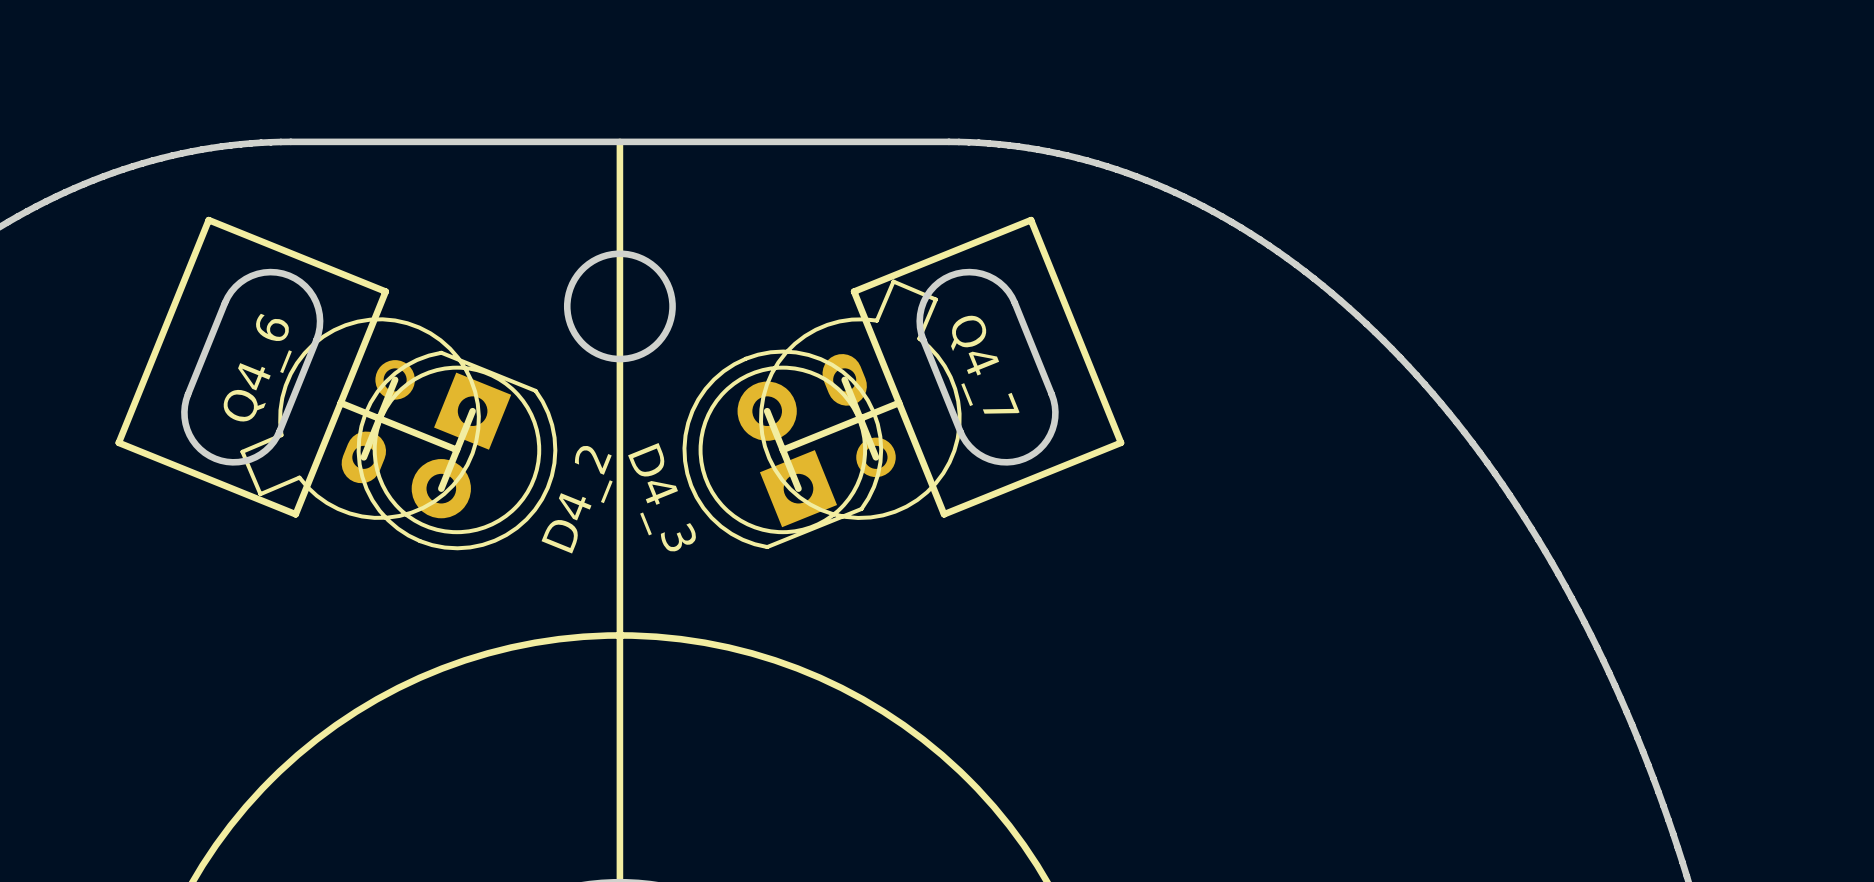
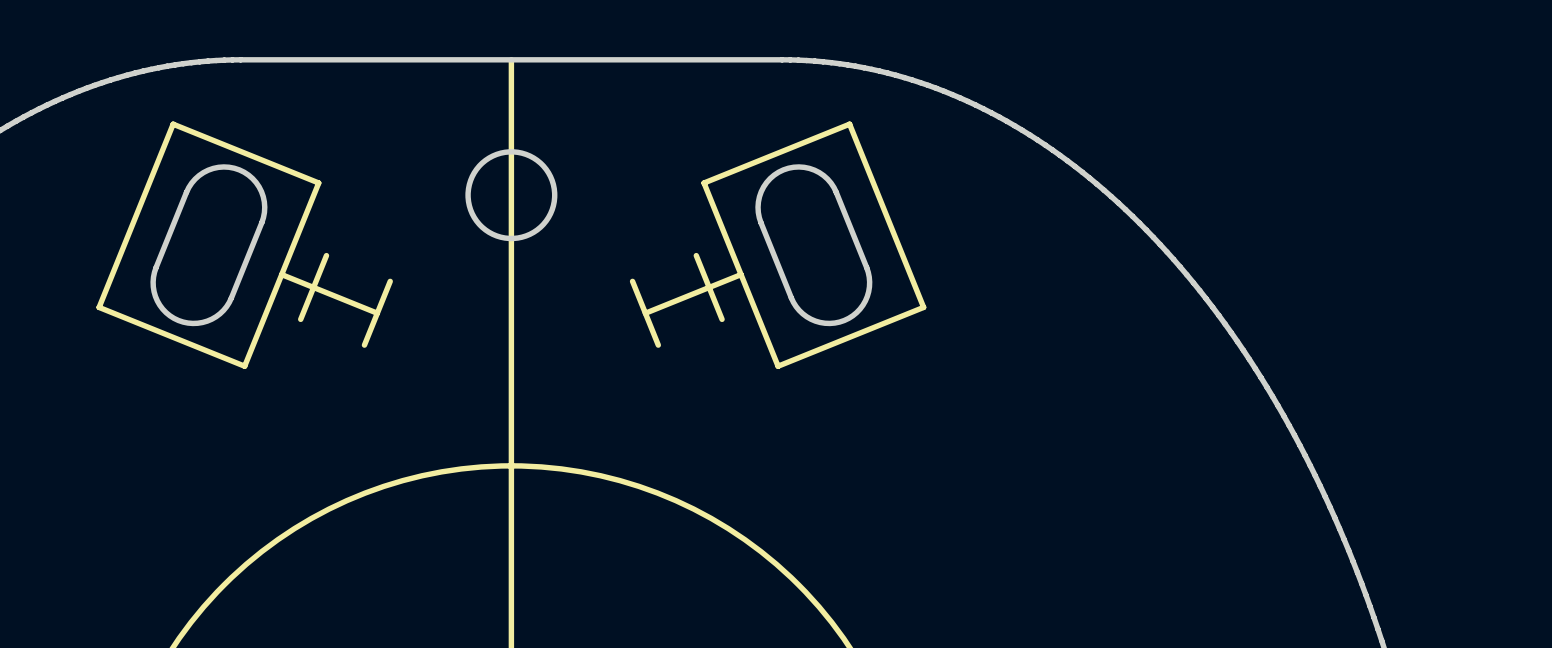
Q4_7: (860, 399) -> none
Q4_6: (360, 418) -> none
D4_3: (782, 449) -> none
D4_2: (456, 450) -> none

